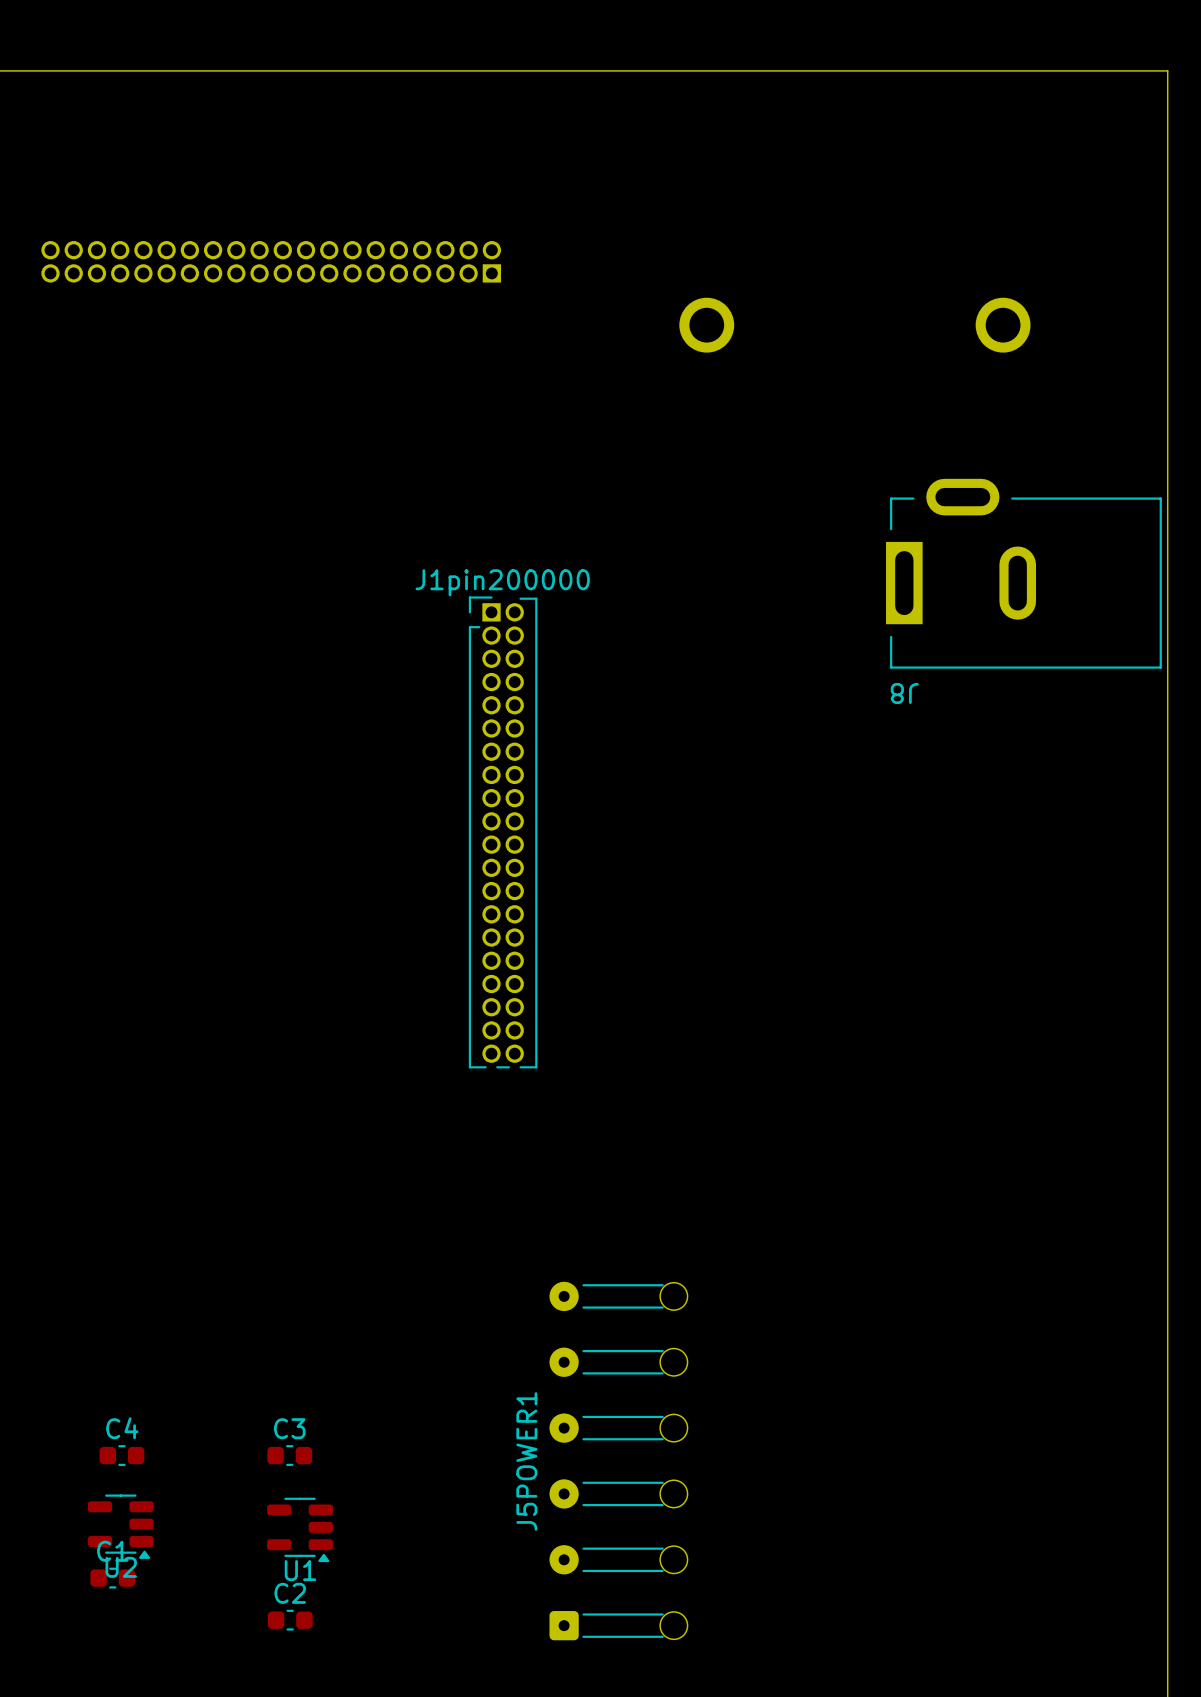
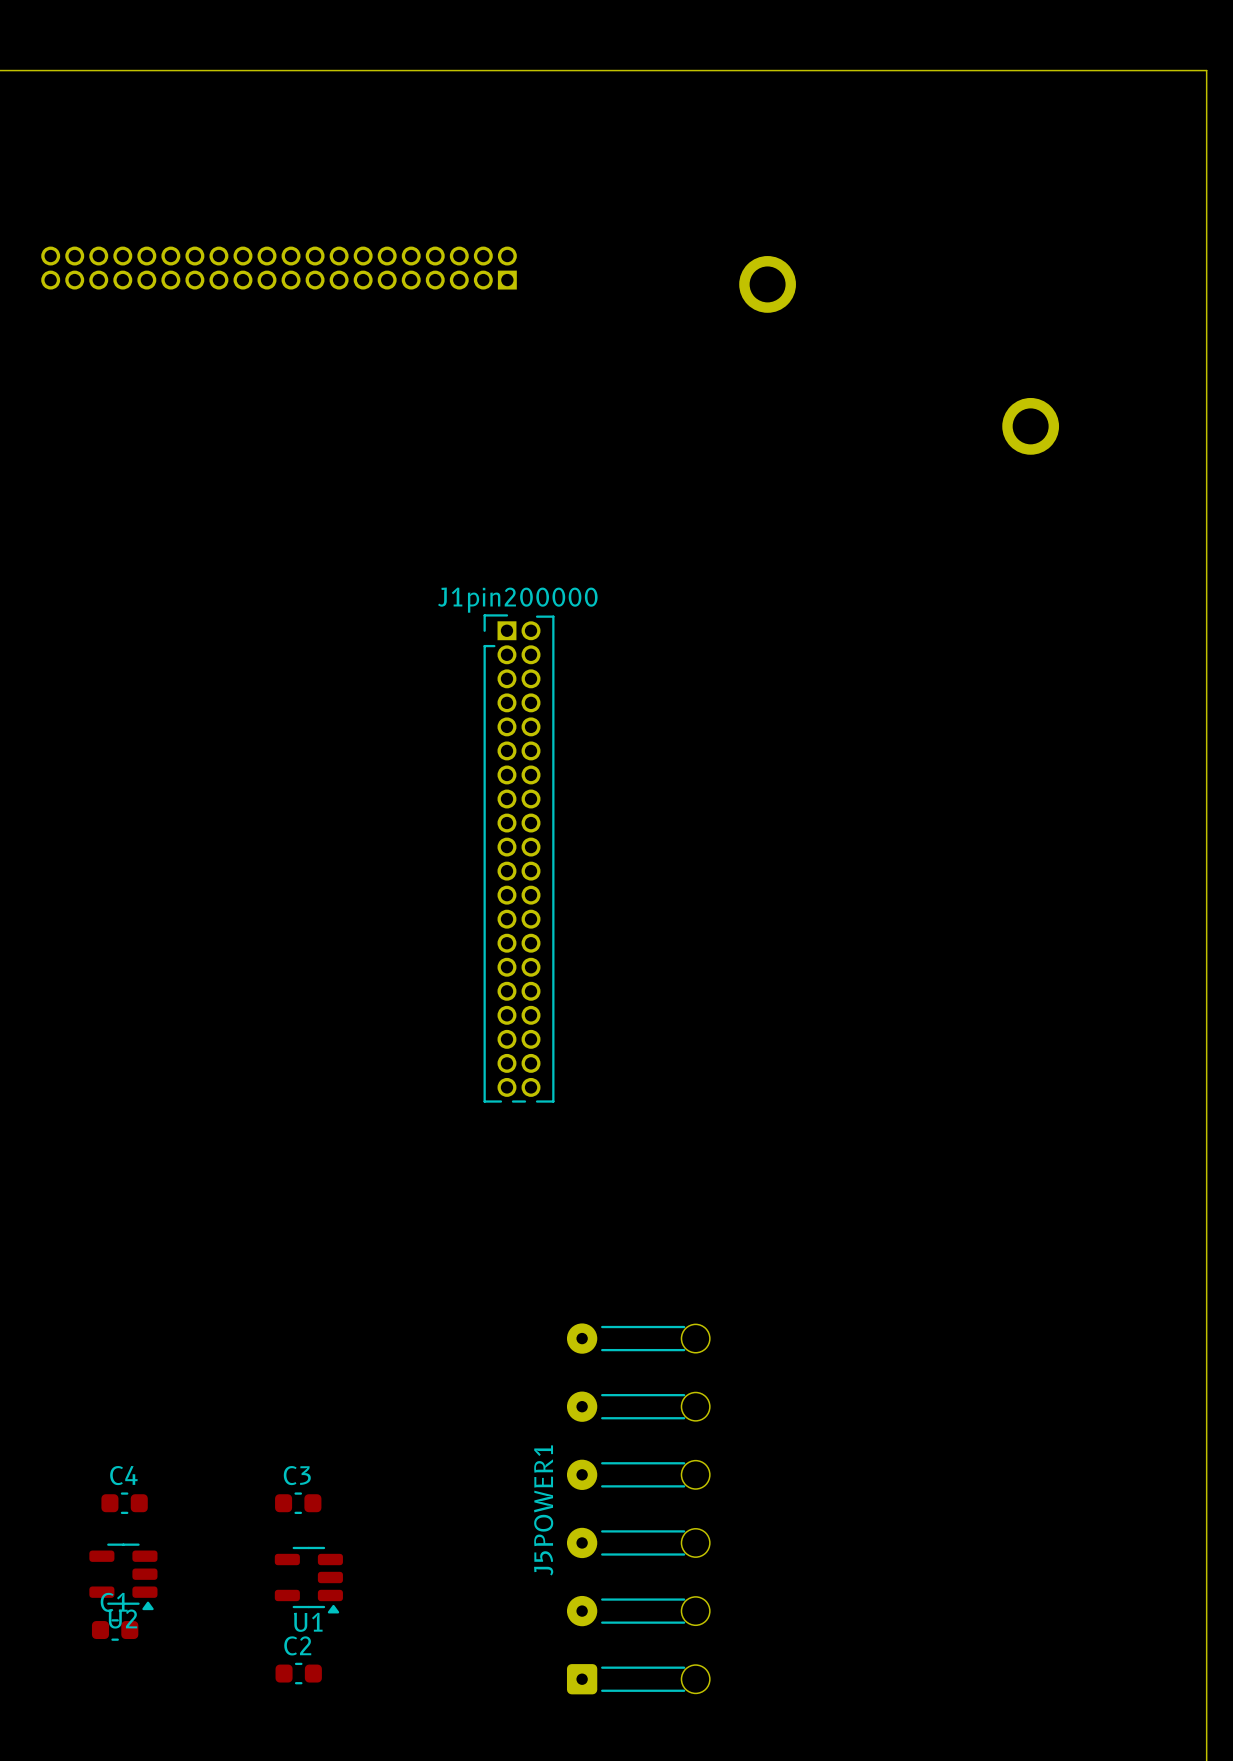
part position: (706, 325) -> (767, 284)
part position: (1003, 325) -> (1030, 426)
J8: (1023, 573) -> none

